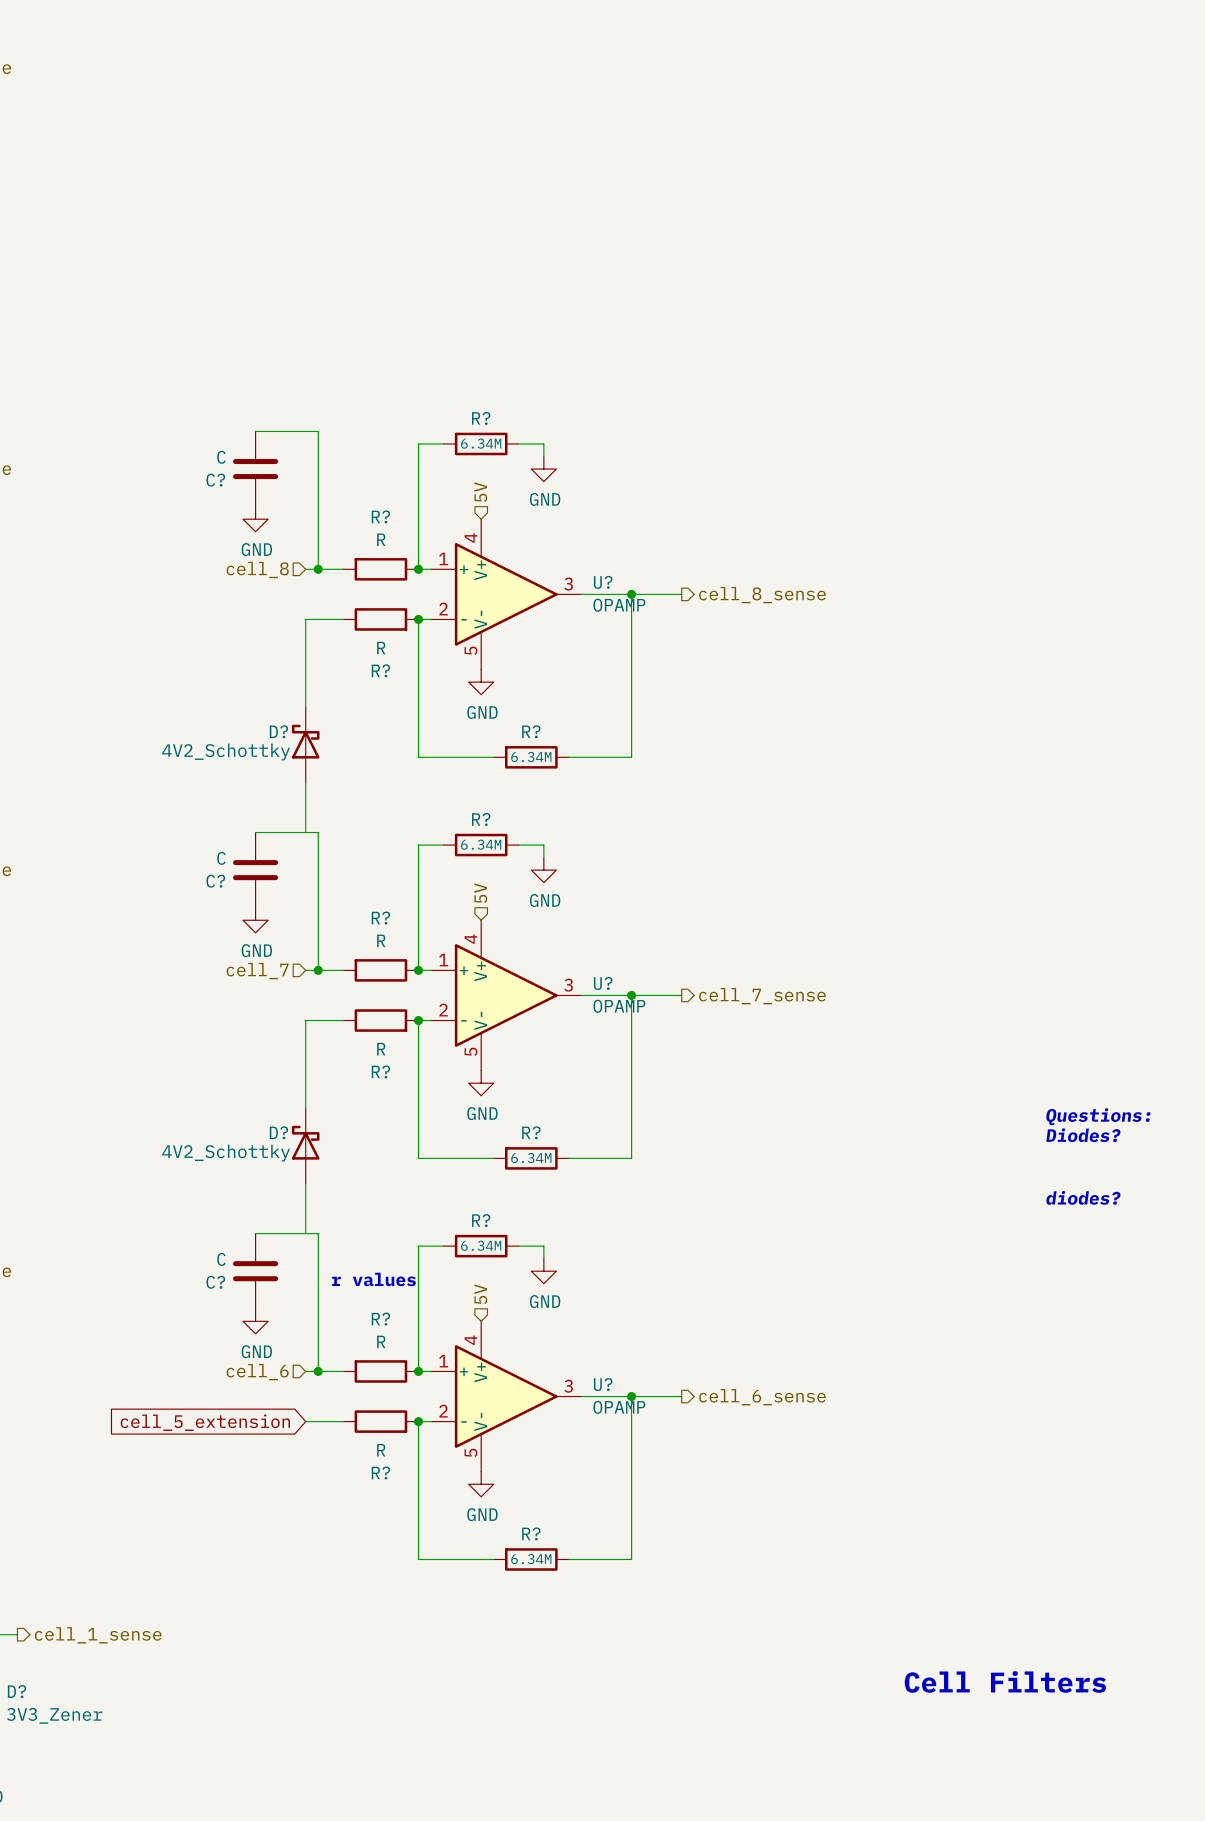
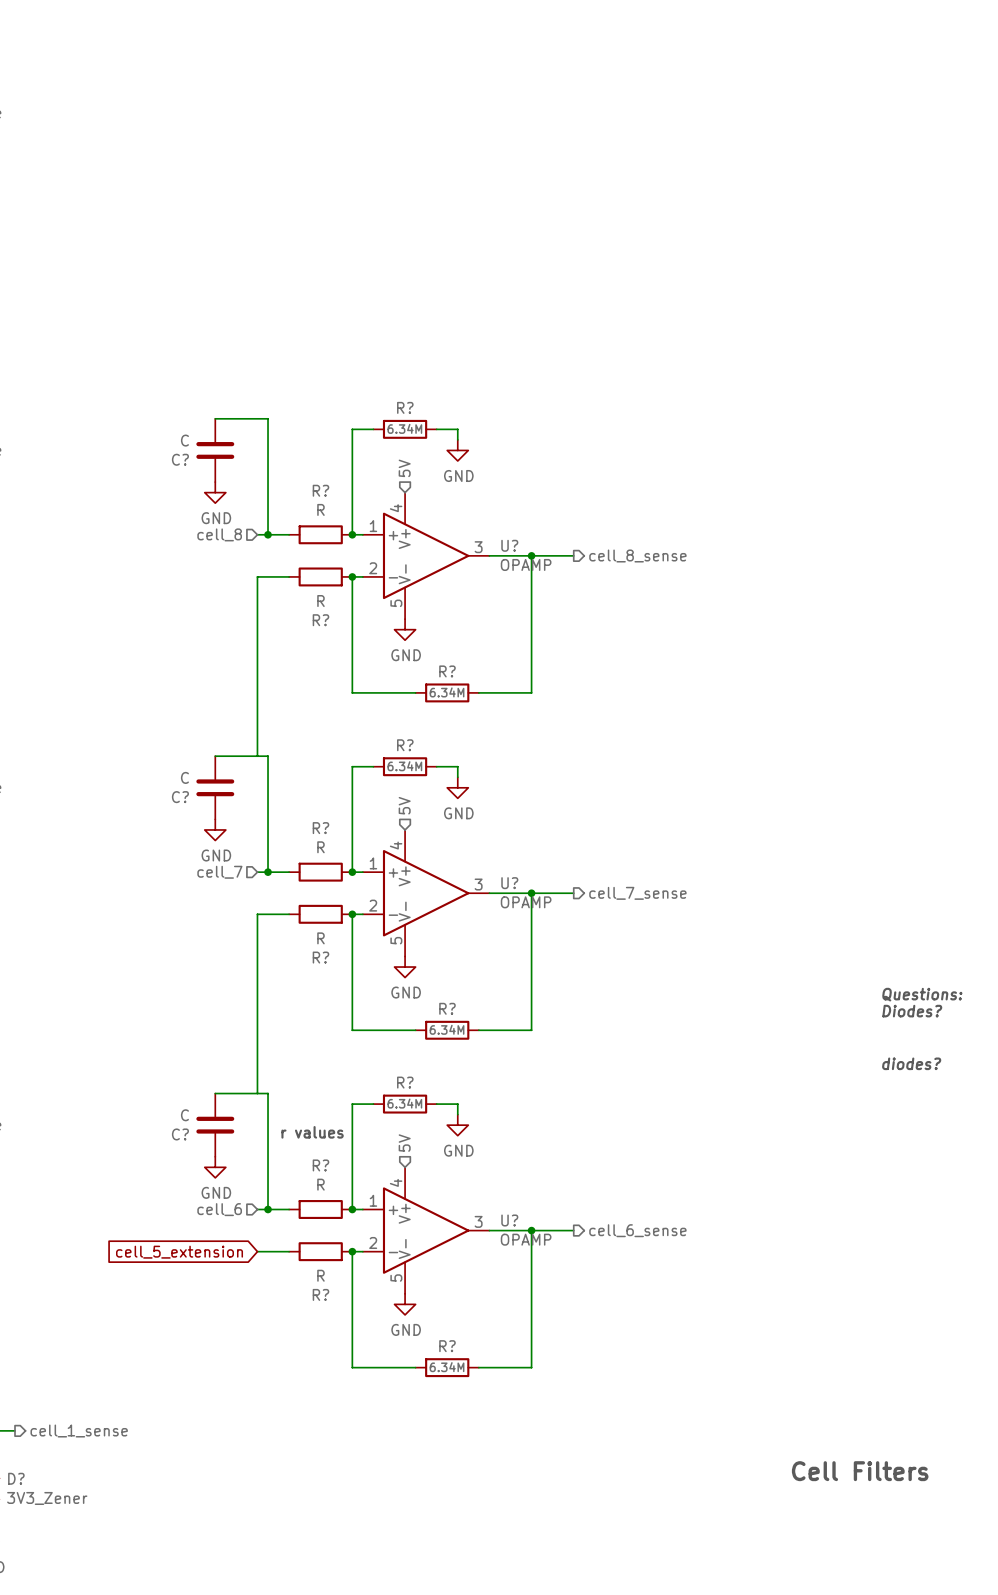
D?: 4V2_Schottky (305, 744) -> none
D?: 4V2_Schottky (305, 1145) -> none

